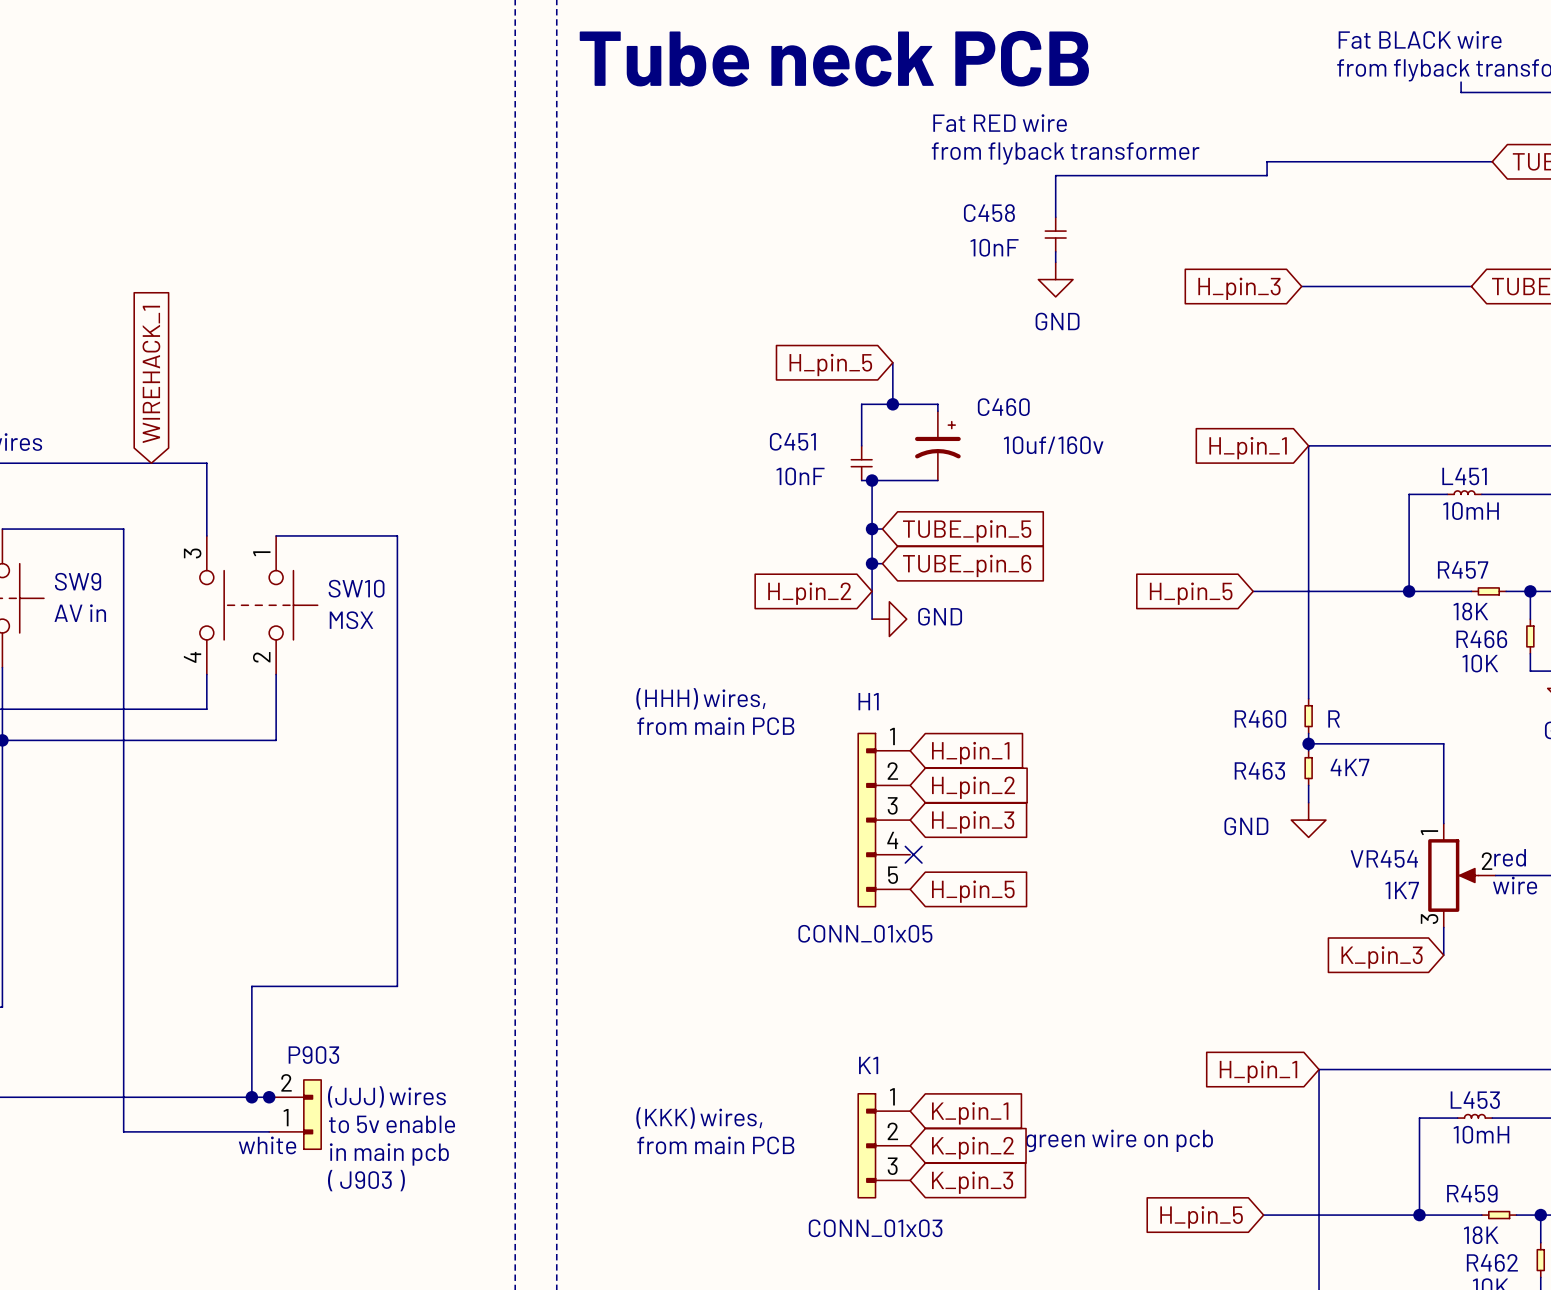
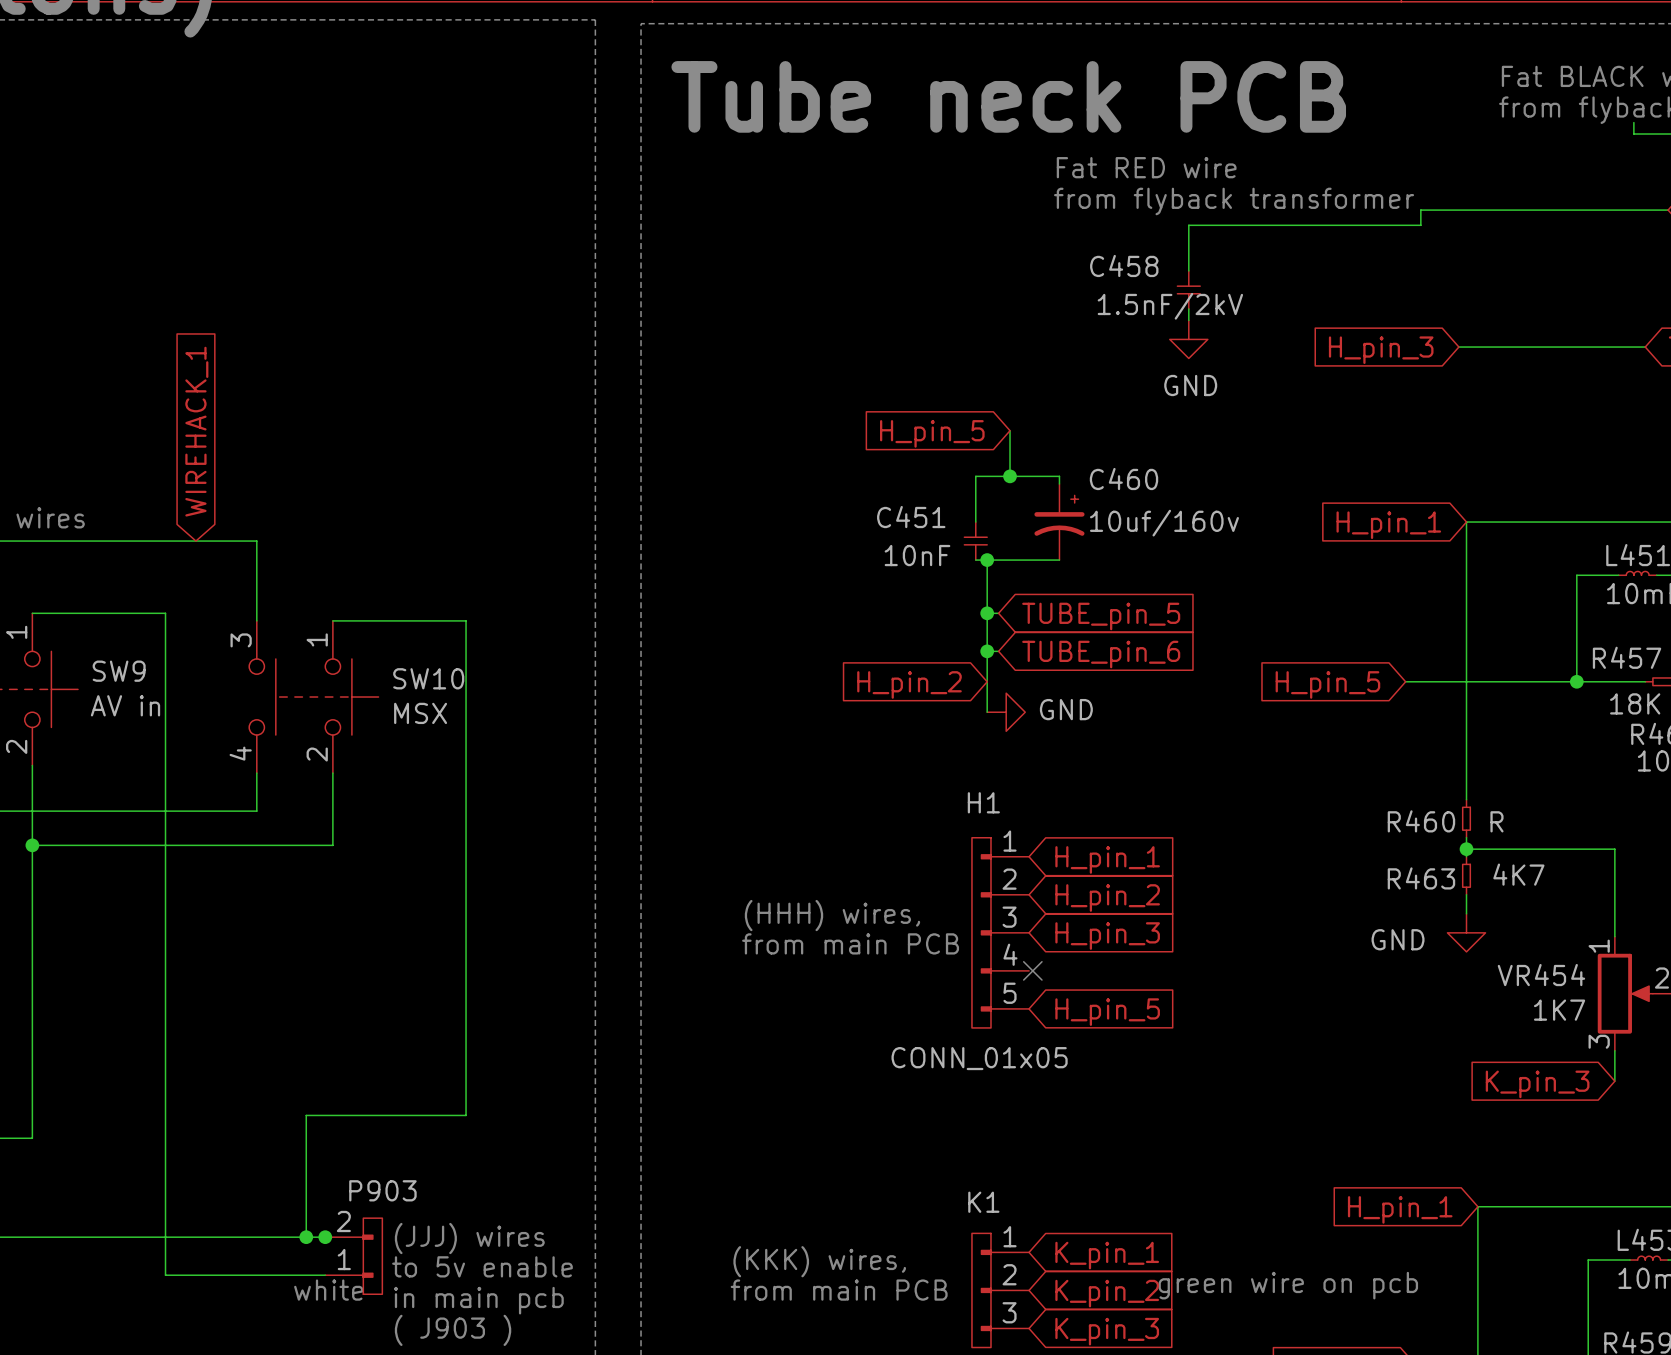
C458 value: 10nF (994, 247) -> 1.5nF/2kV (1170, 306)
text position: (HHH) wires, (700, 698) -> (HHH) wires, (832, 915)
text position: from main PCB (715, 726) -> from main PCB (850, 943)

